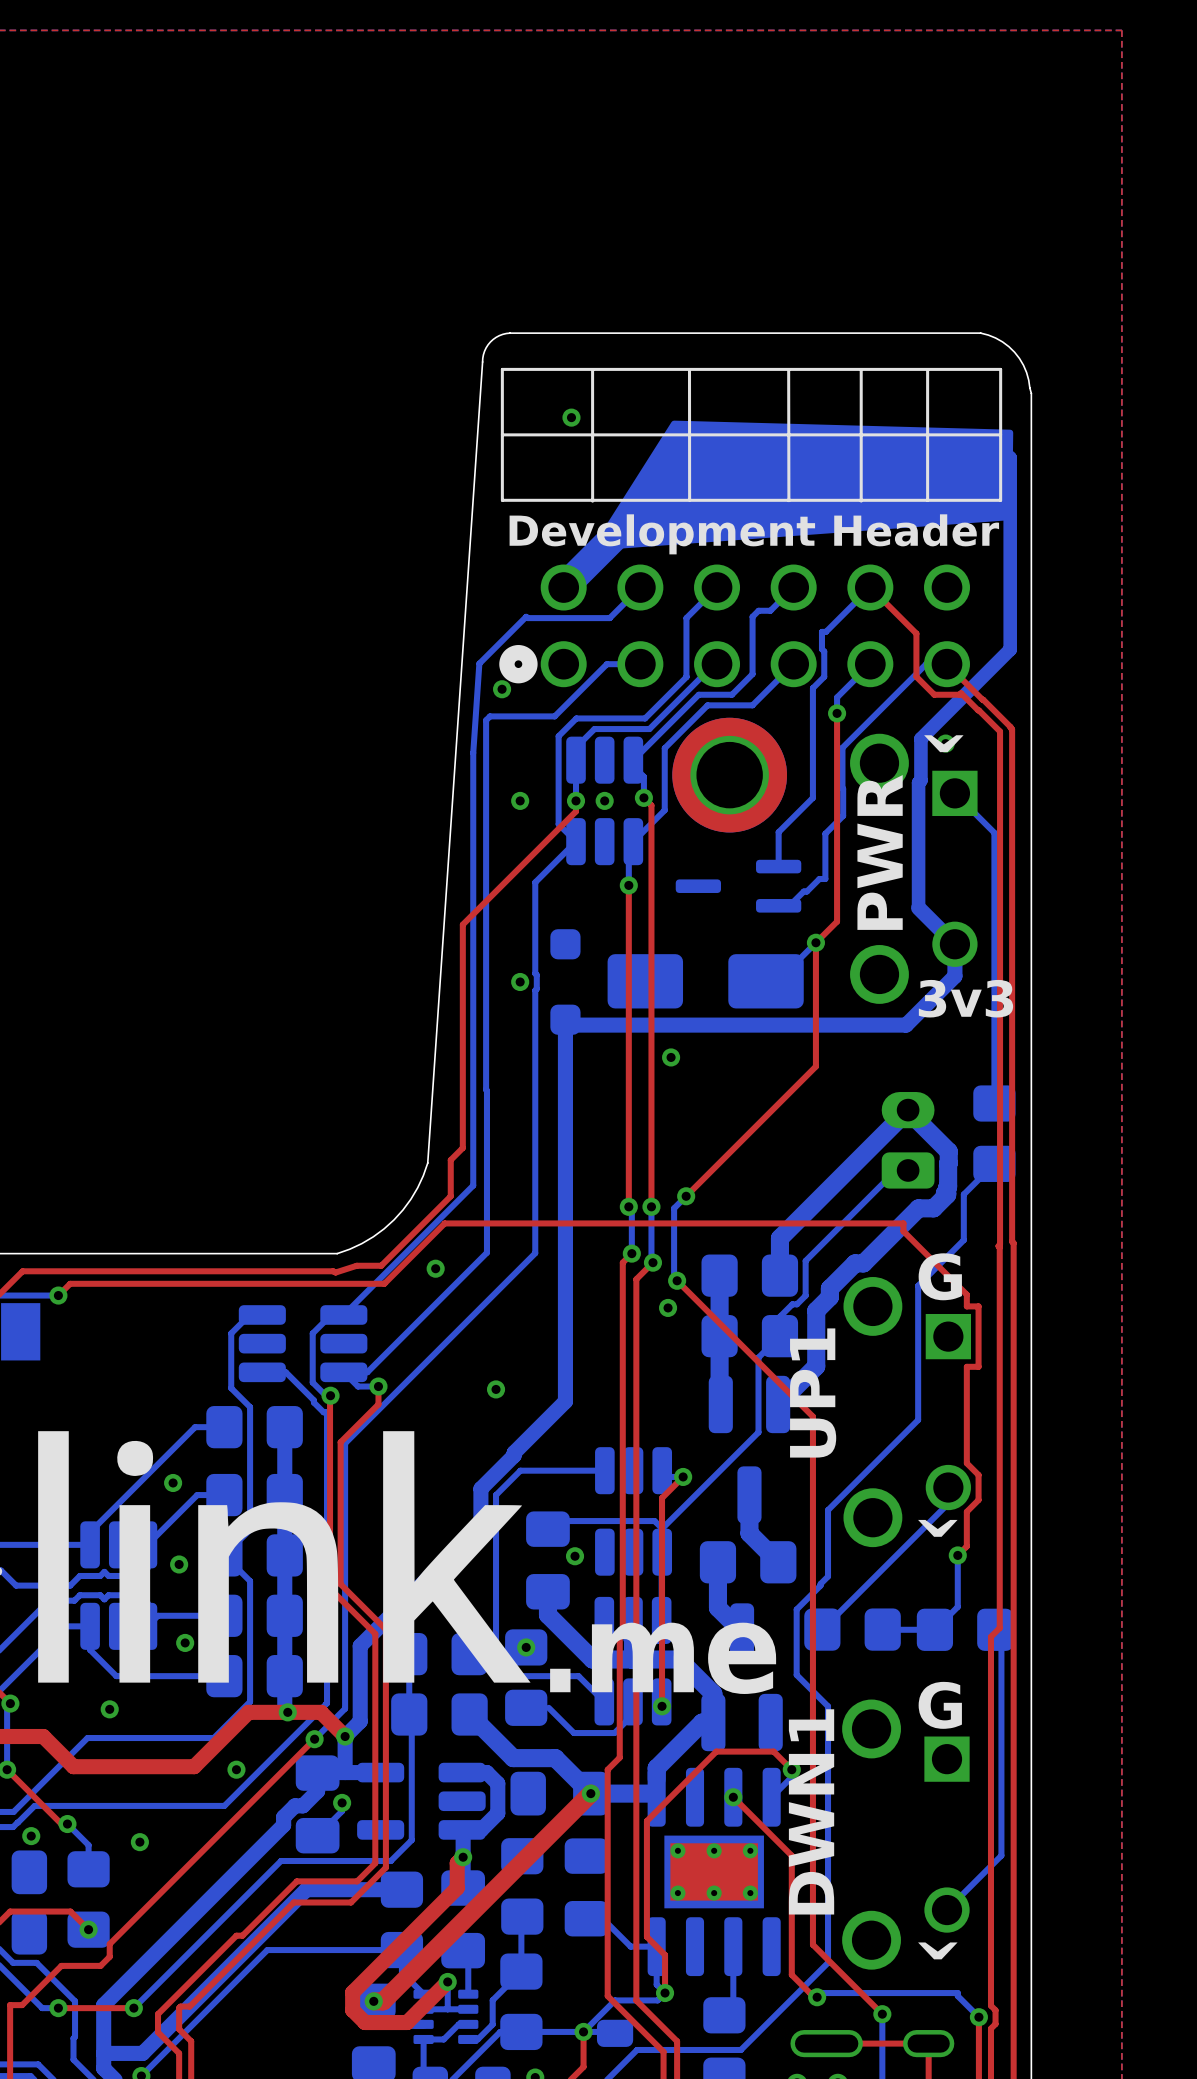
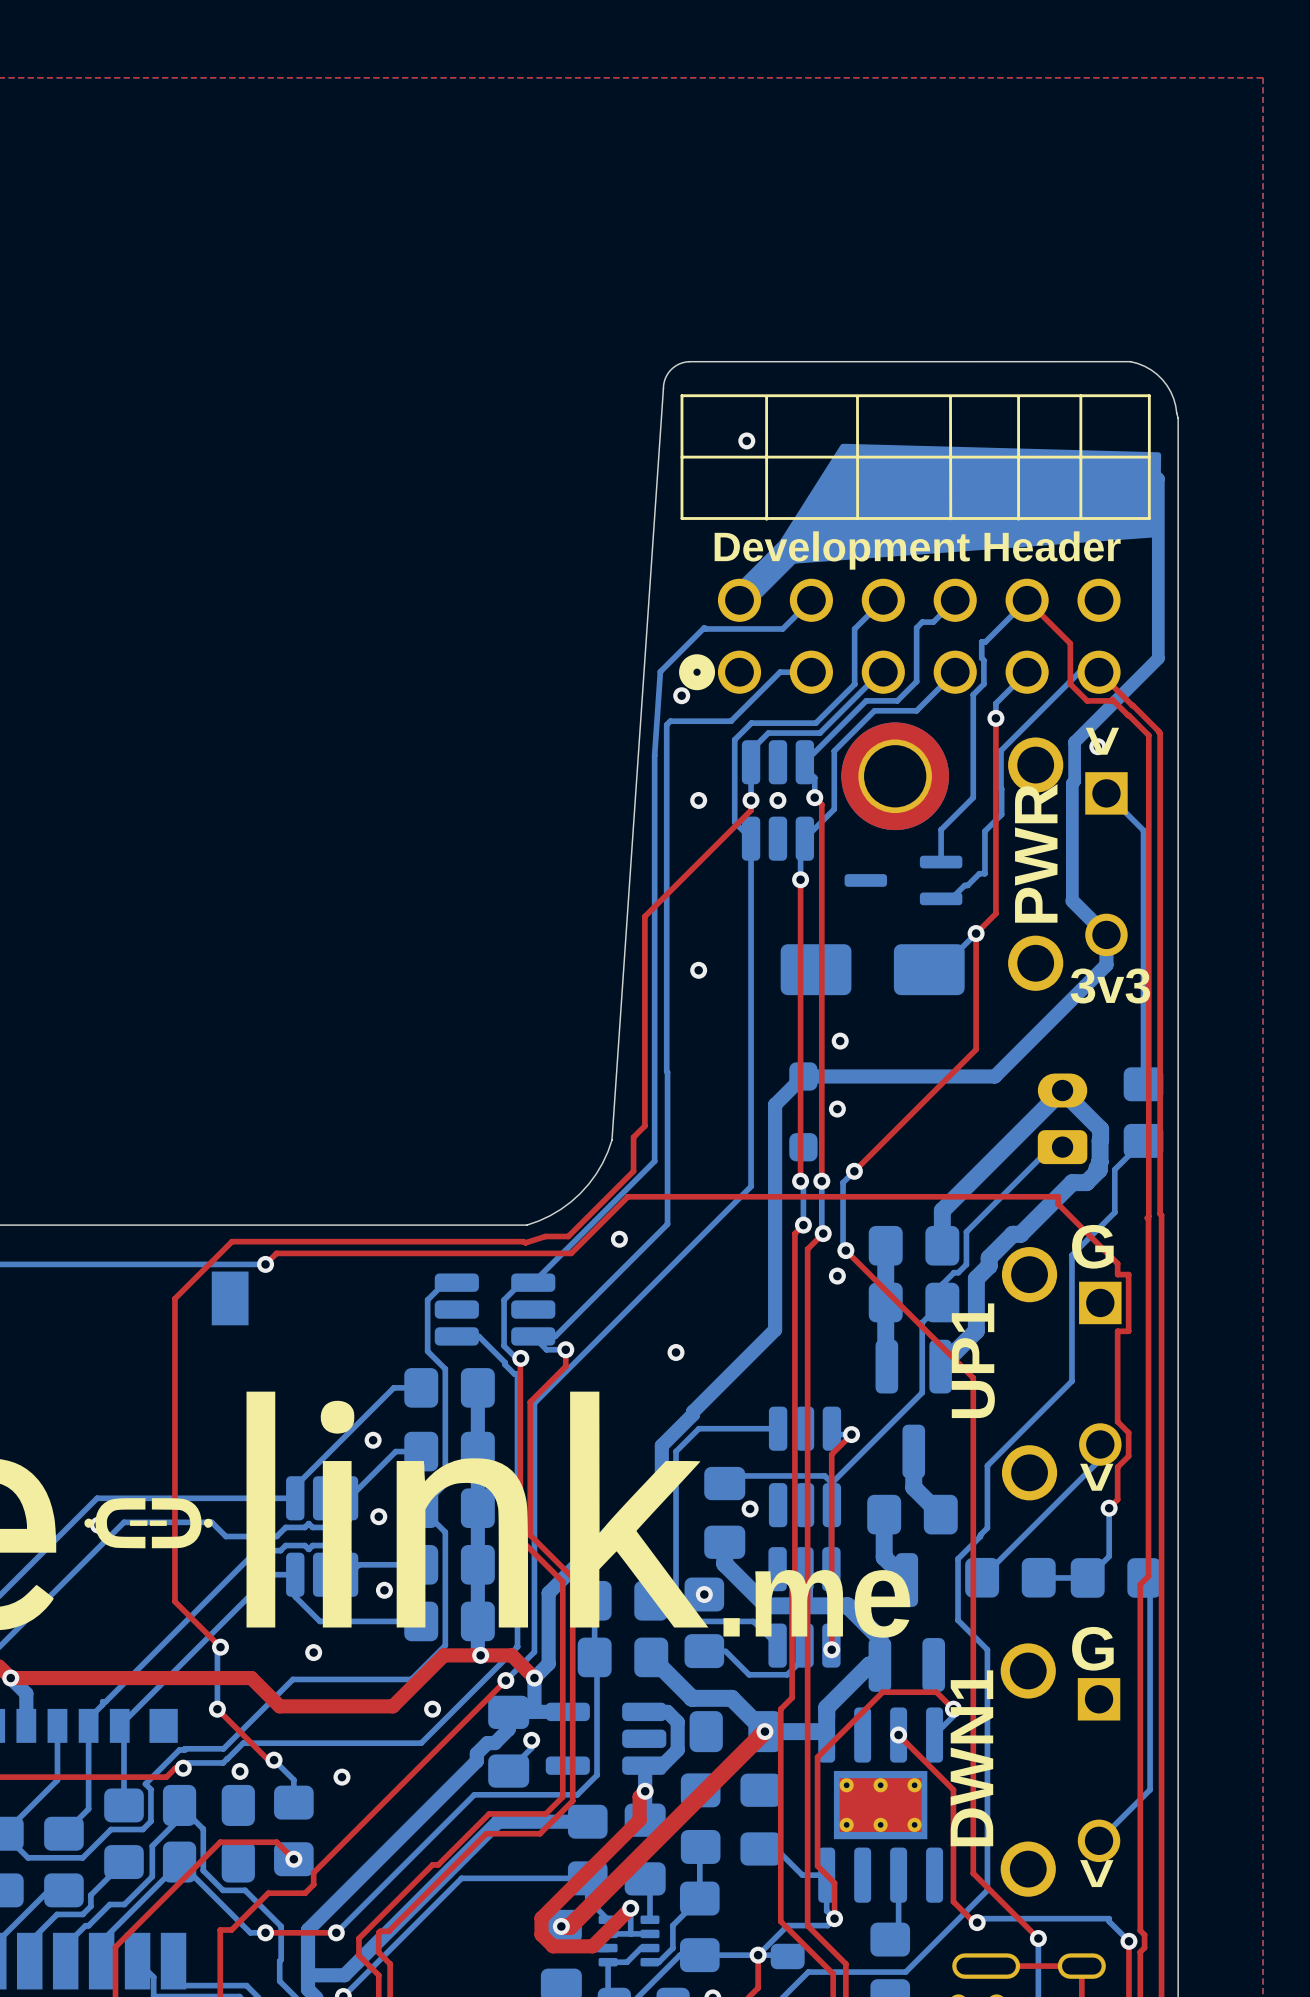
bottom track: (576, 841) (535, 882) (535, 973) (536, 975) (535, 1253) -> (751, 838) (751, 1186) (712, 1224)
part position: (565, 981) -> (803, 1111)
bottom track: (906, 1025) (570, 1025) (565, 1019) (565, 1401) -> (1060, 1010) (994, 1076) (803, 1076) (775, 1104) (775, 1329) (741, 1363)
via: none -> (837, 1109)

